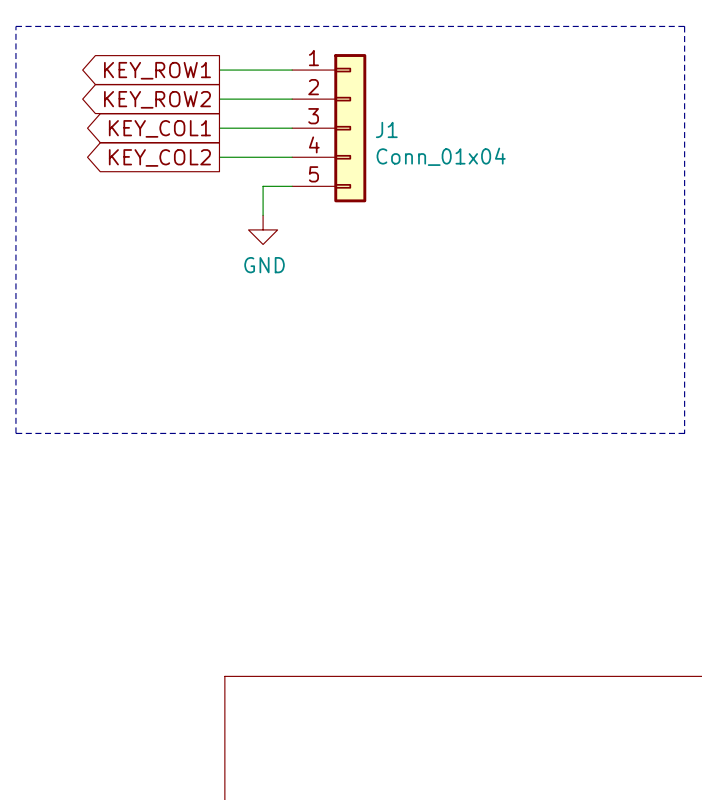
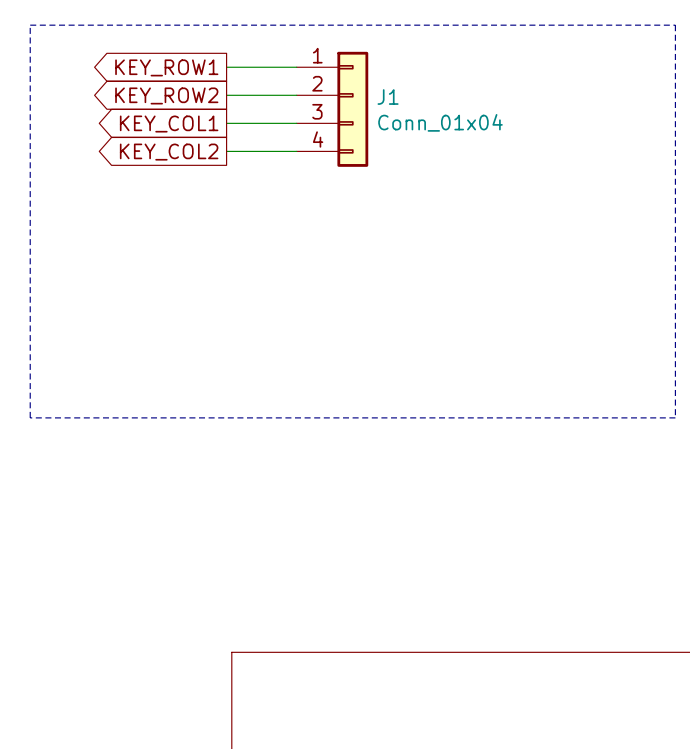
J1 symbol: [292, 54, 367, 203] -> [296, 51, 369, 167]
wire: (292, 186) (263, 186) (263, 215) -> none
power symbol: GND (263, 229) -> none

